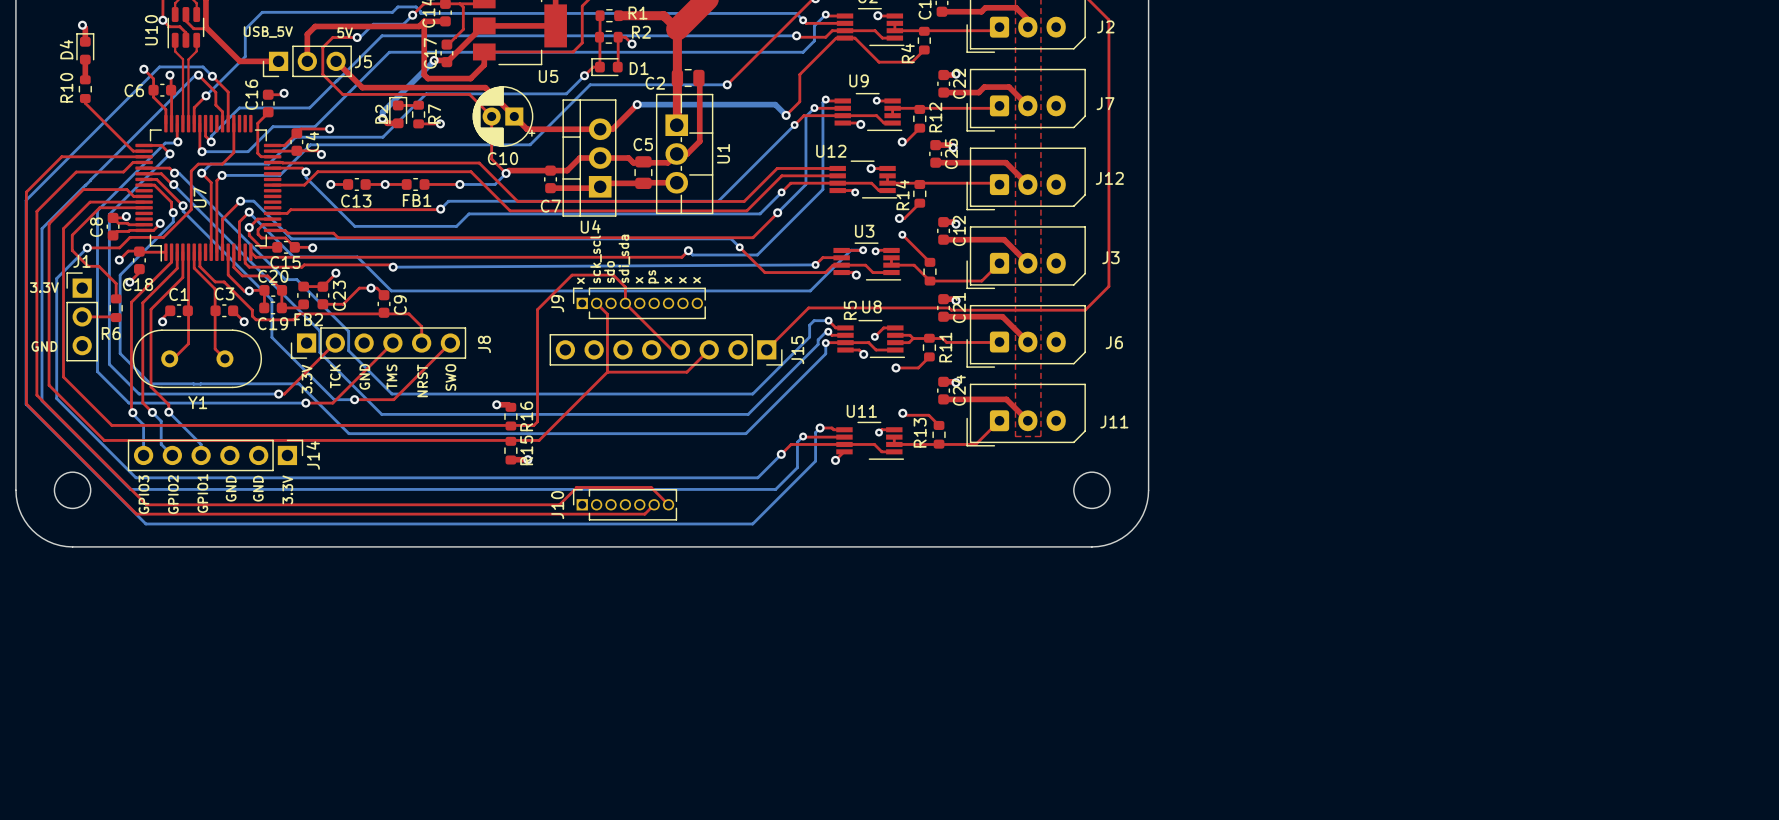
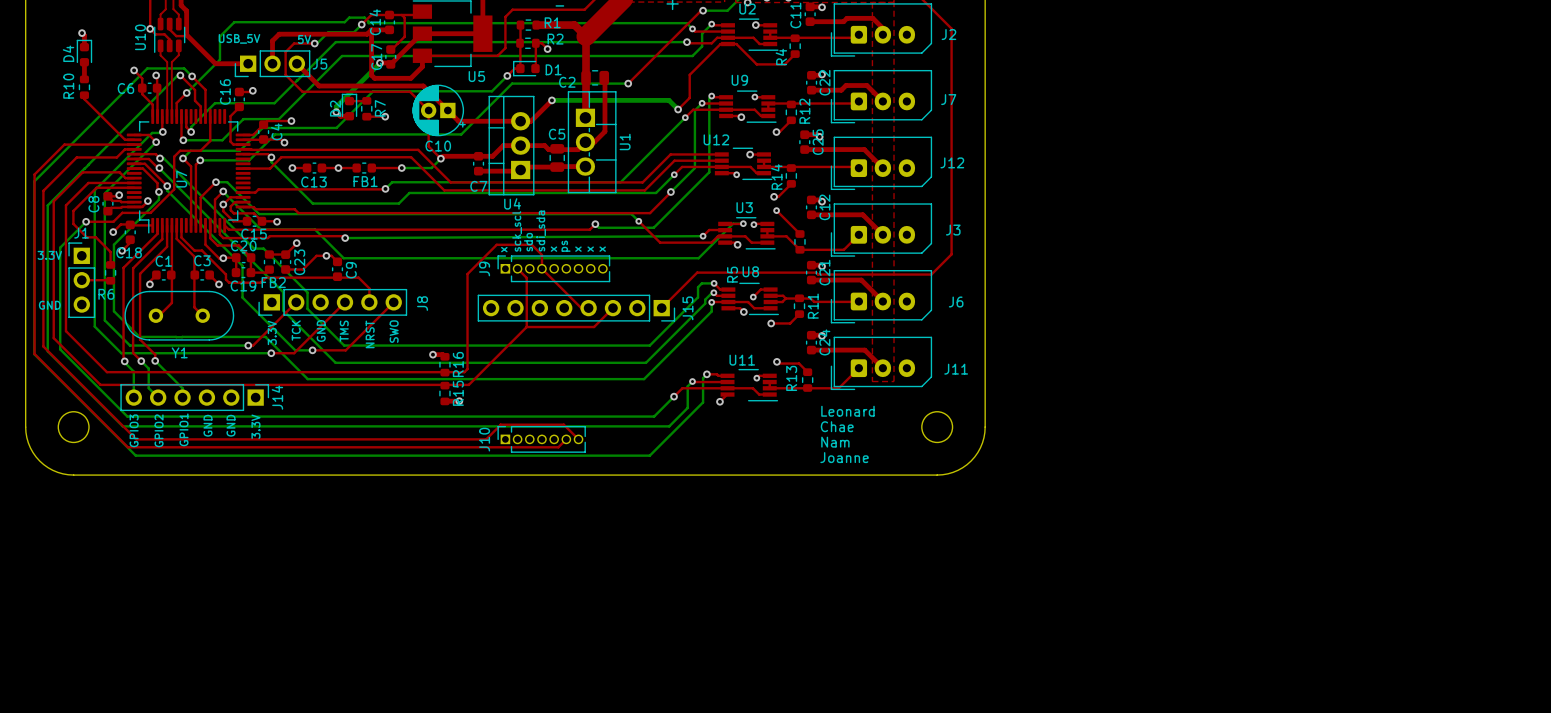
text: none -> Leonard (847, 411)
text: none -> Chae (837, 426)
text: none -> Nam (835, 442)
text: none -> Joanne (844, 457)

